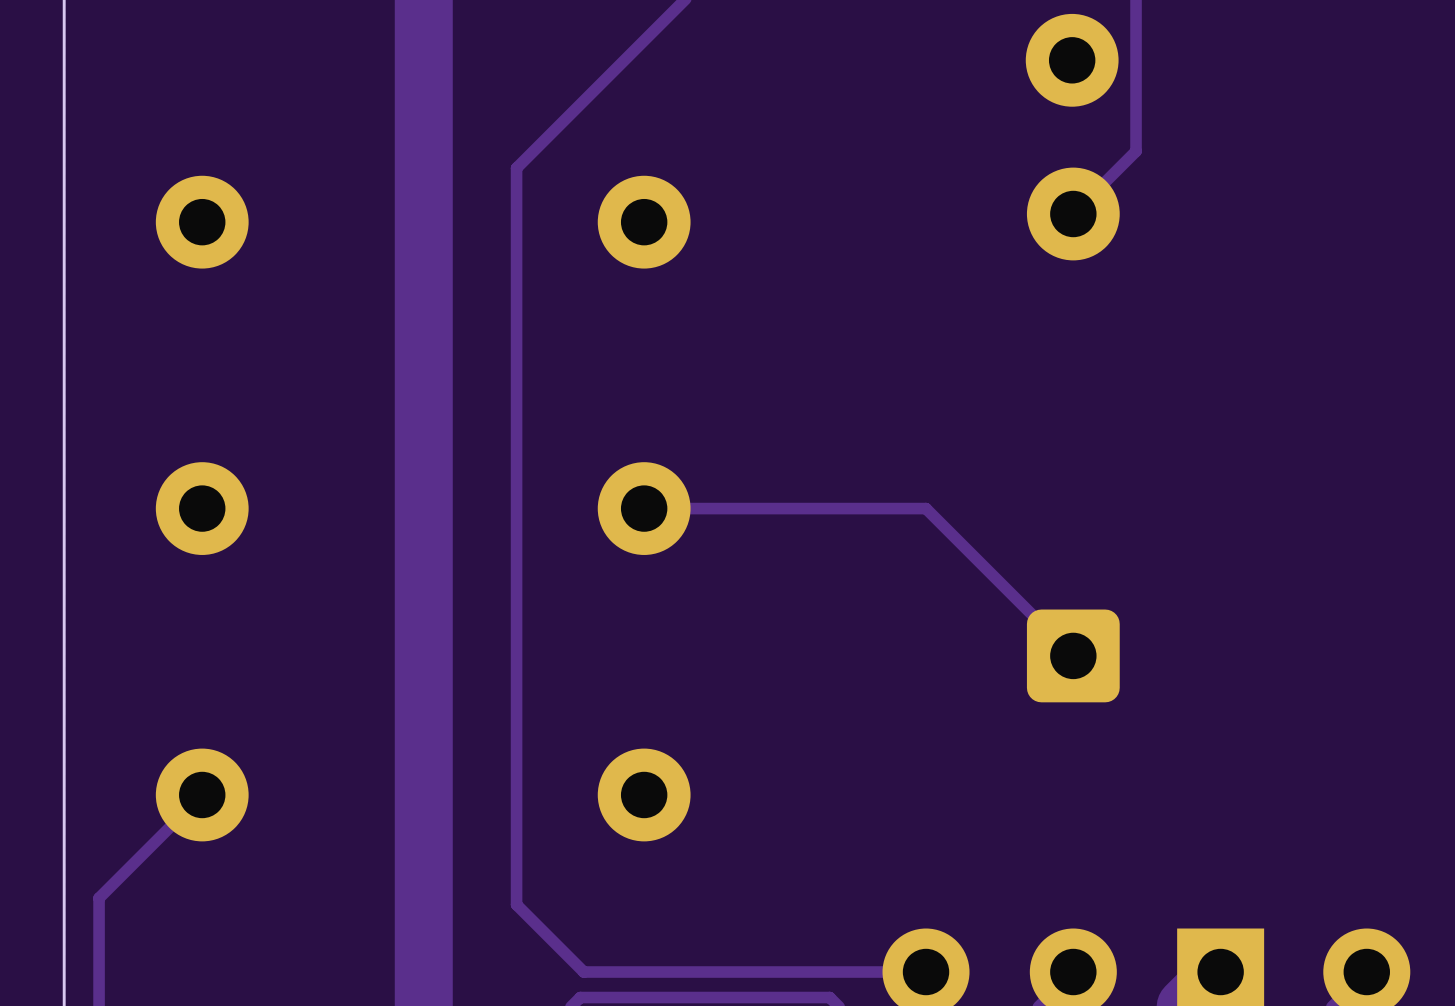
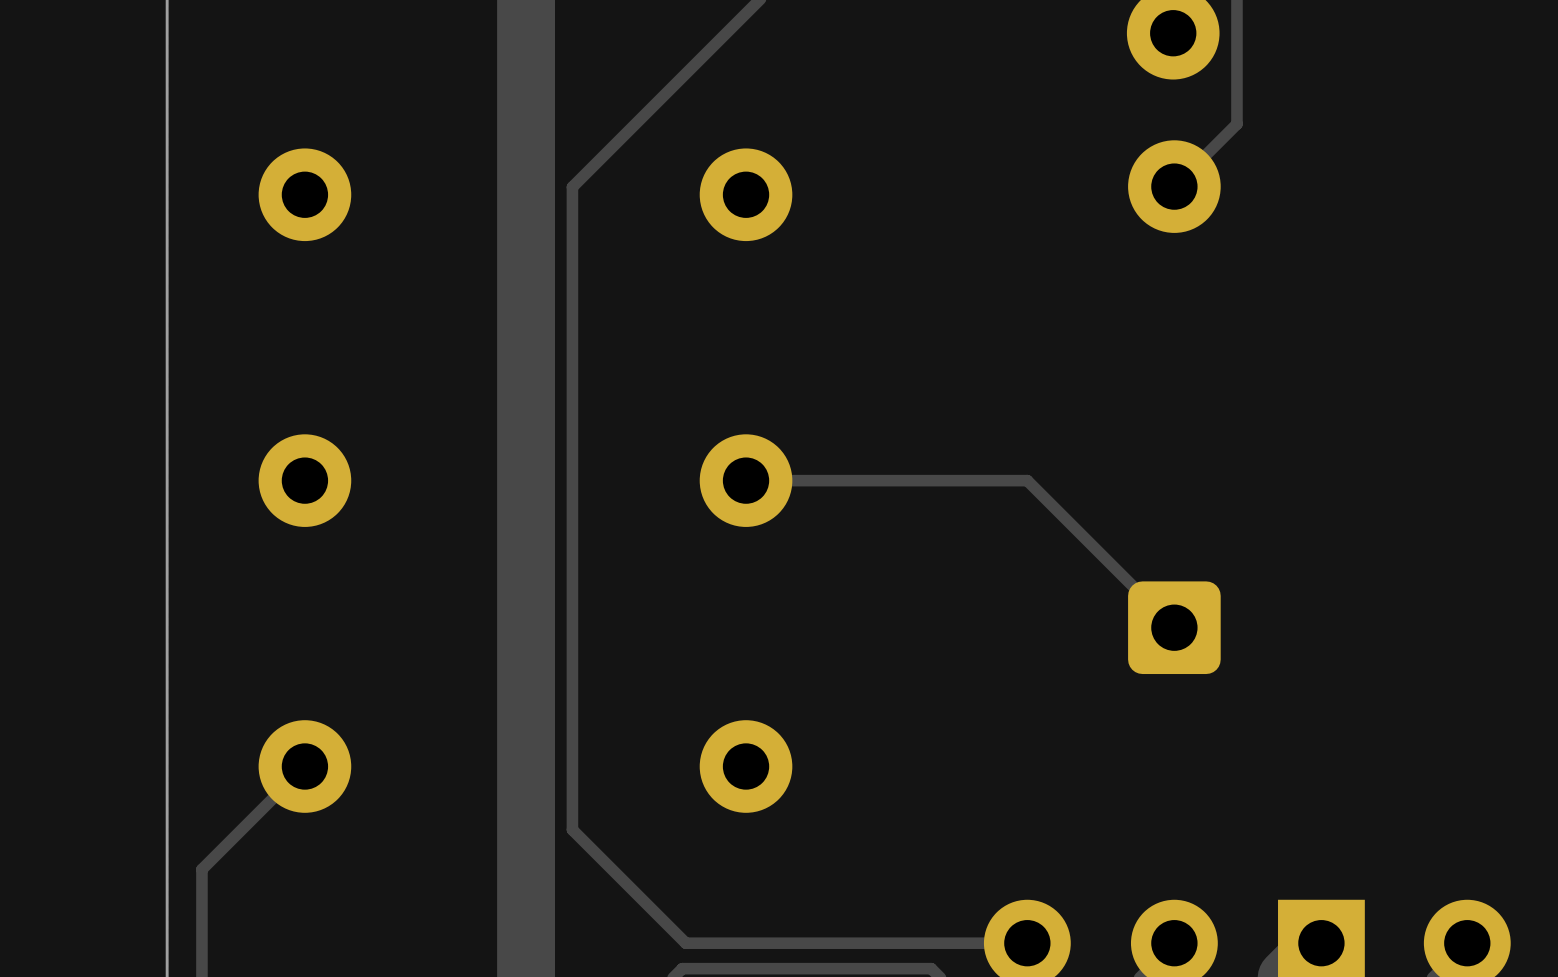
track: (516, 168) (516, 904) -> (618, 140) (572, 187) (572, 829) (618, 876)

